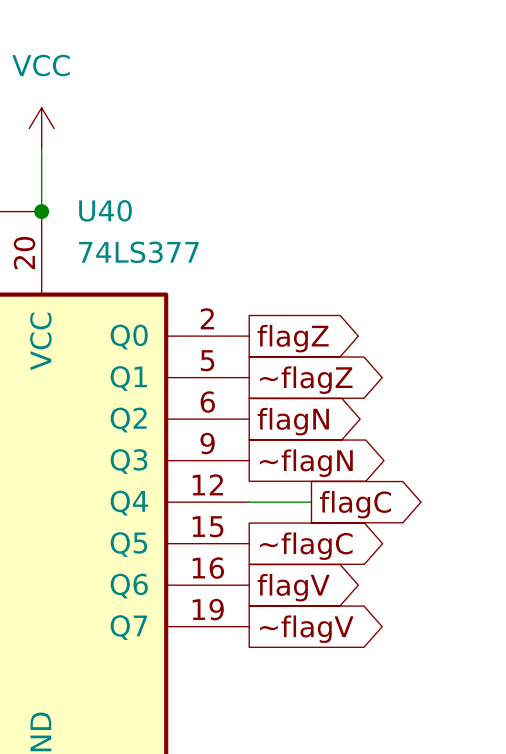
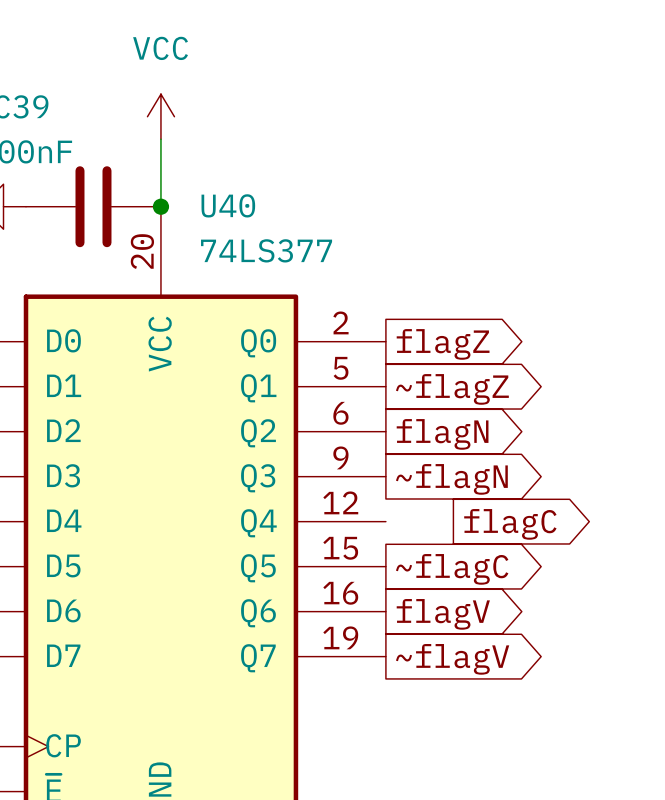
wire: (249, 502) (311, 502) -> none

